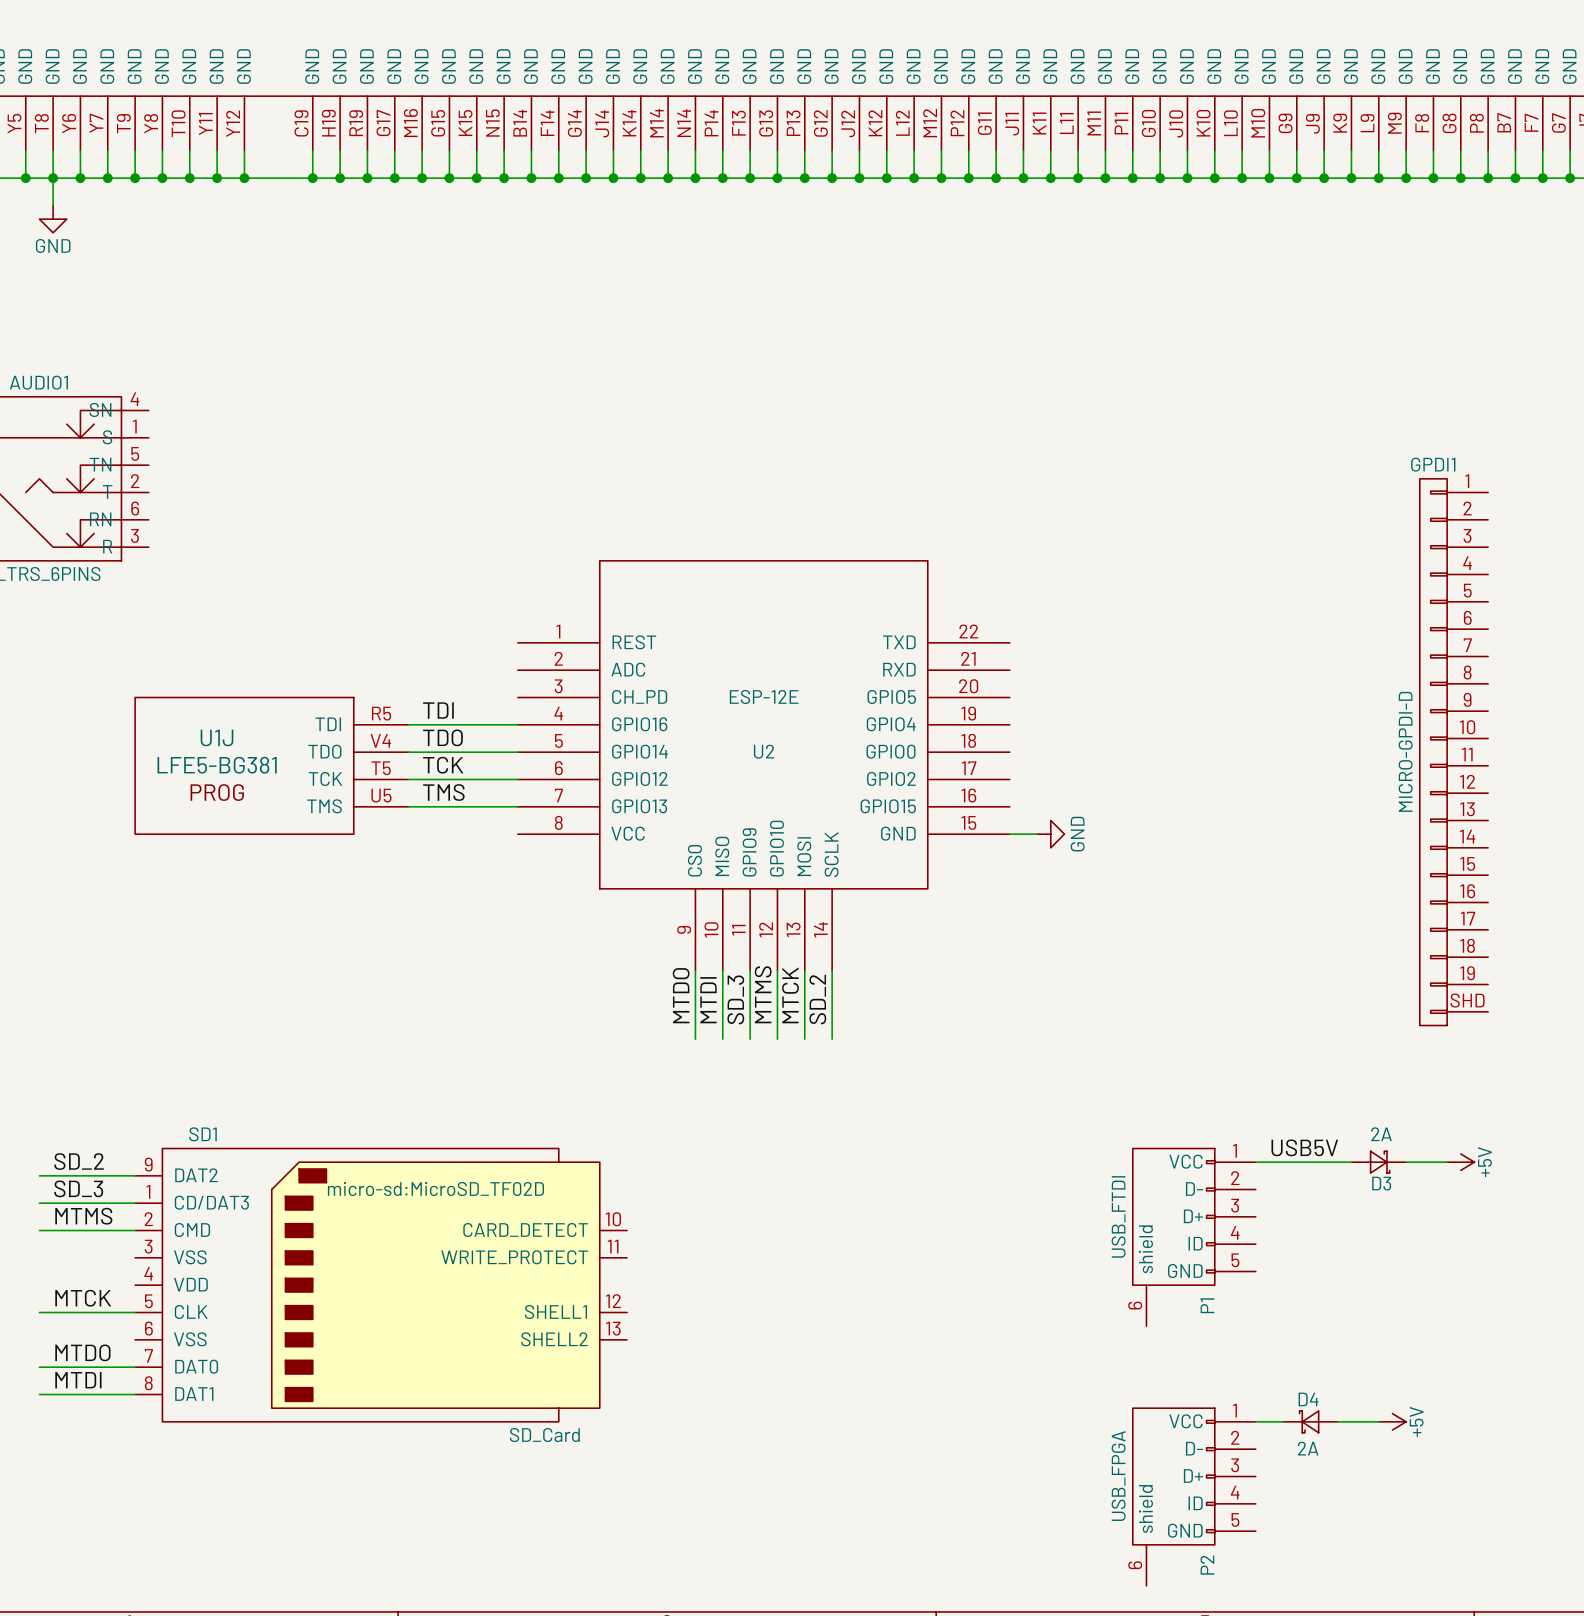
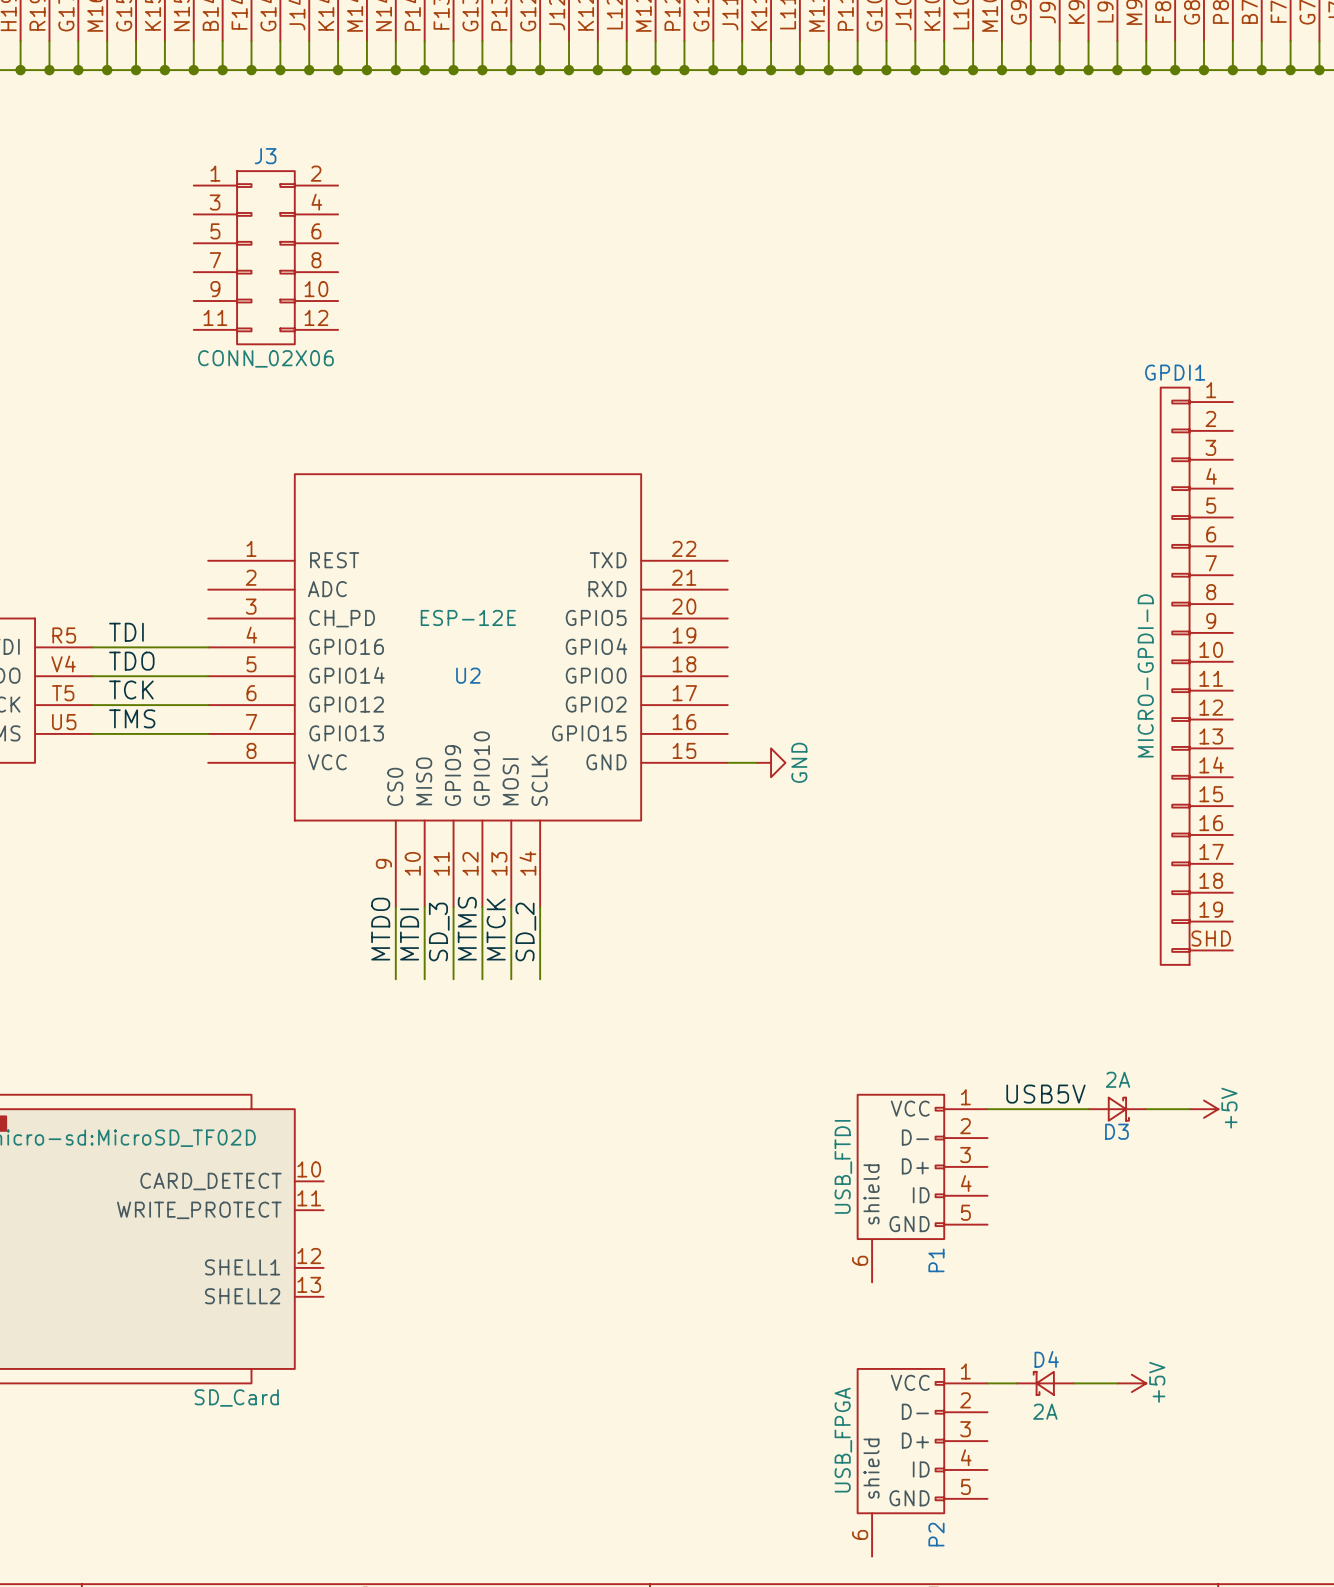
J3: none -> CONN_02X06 (265, 257)

